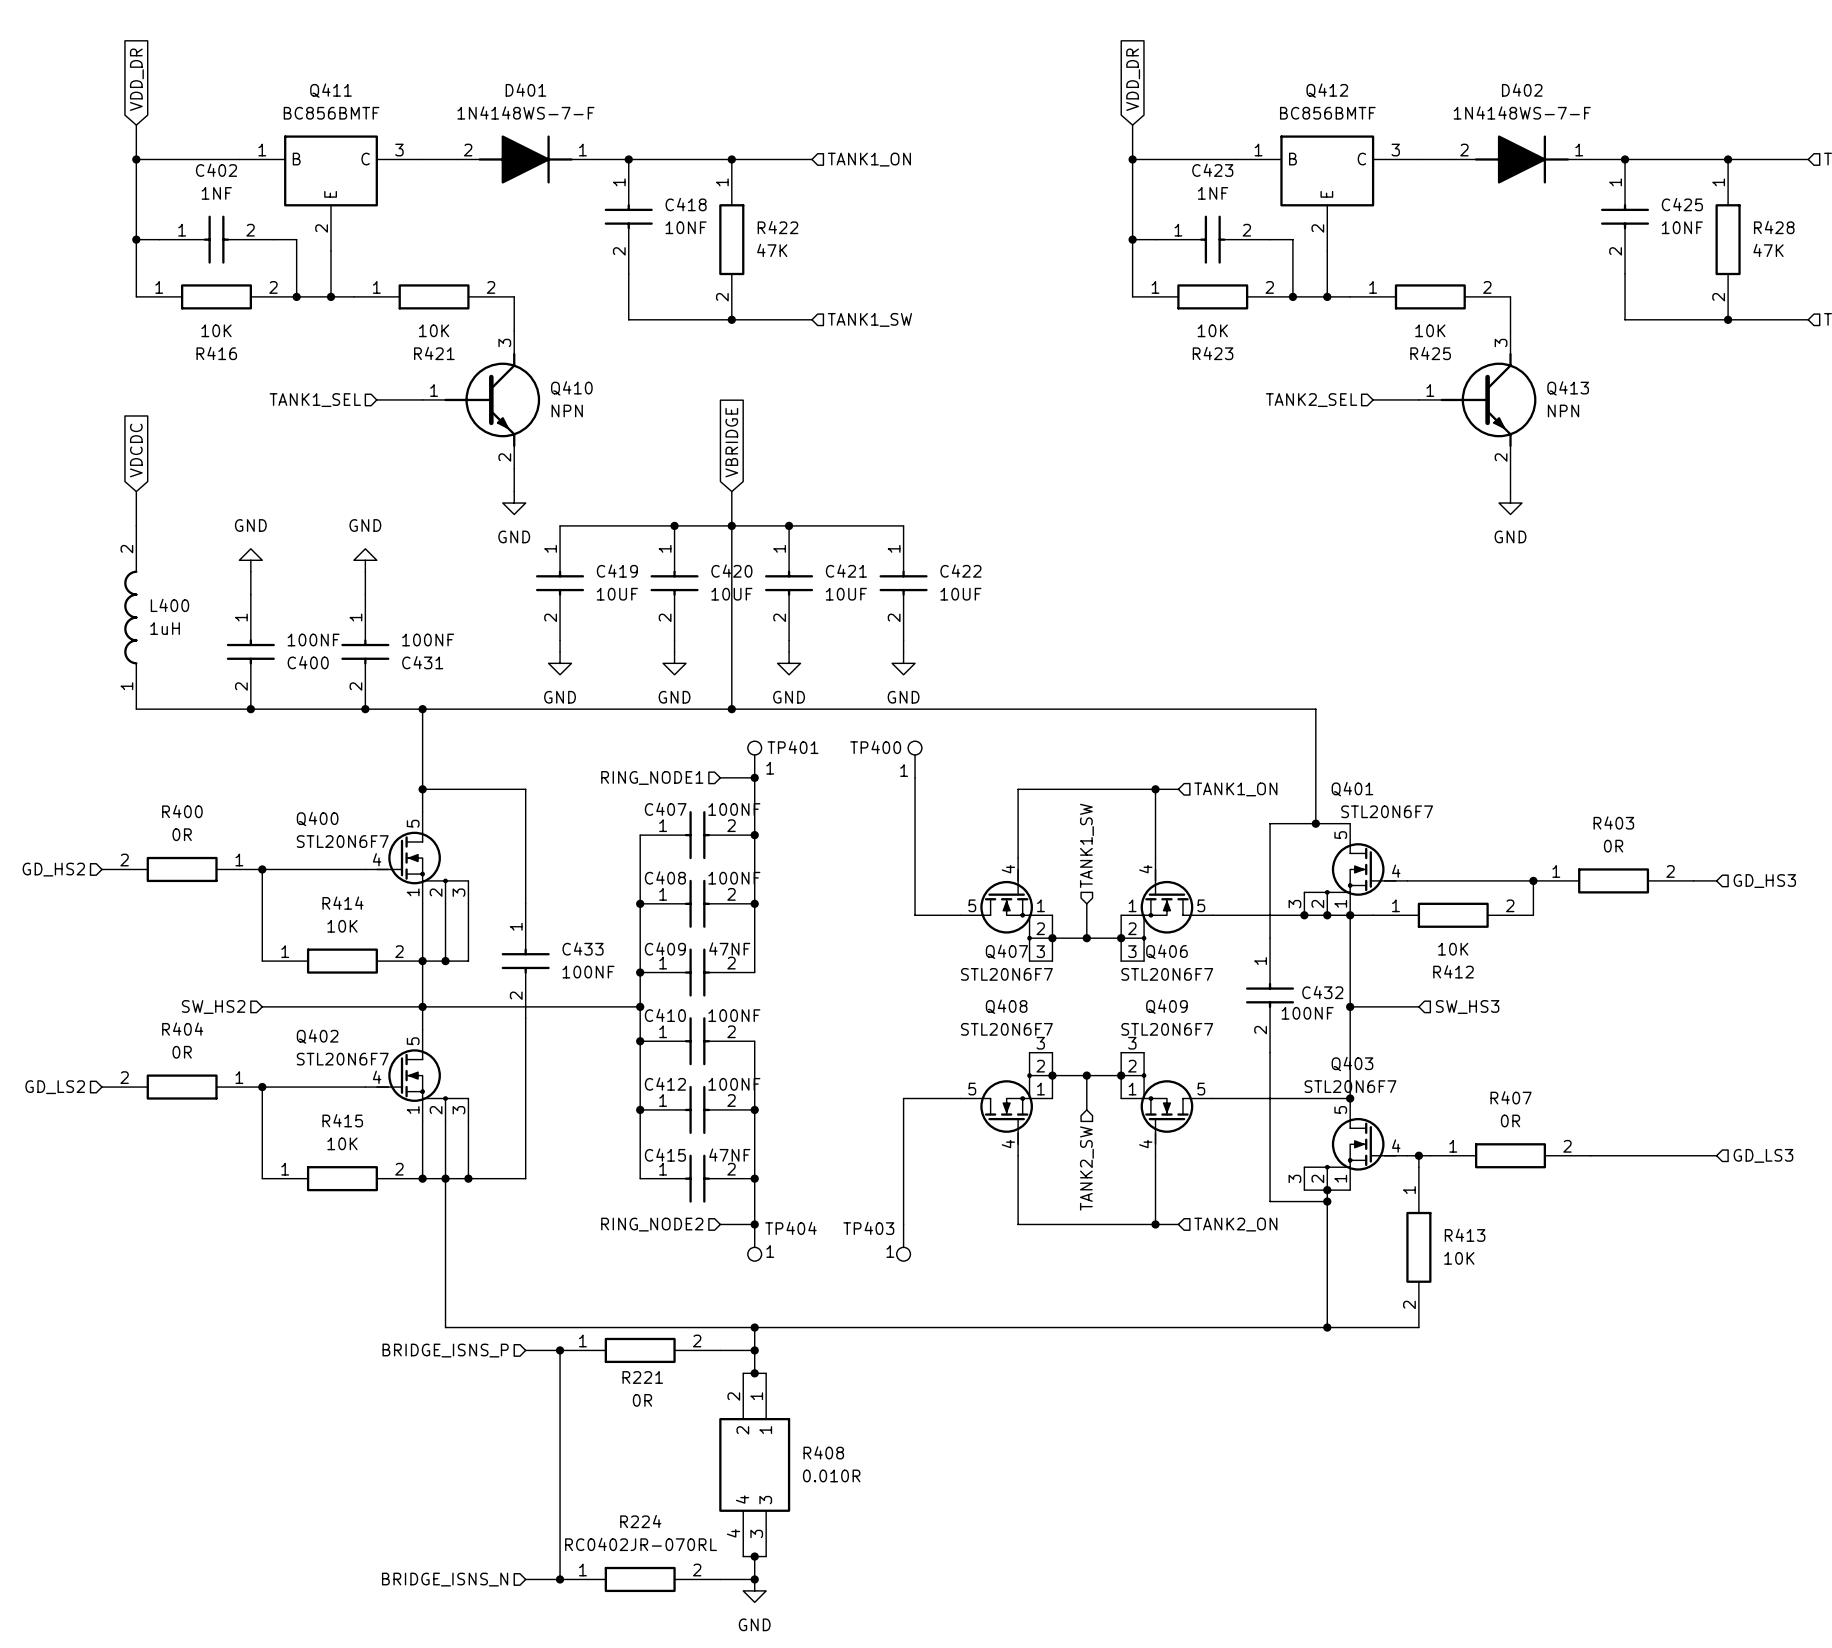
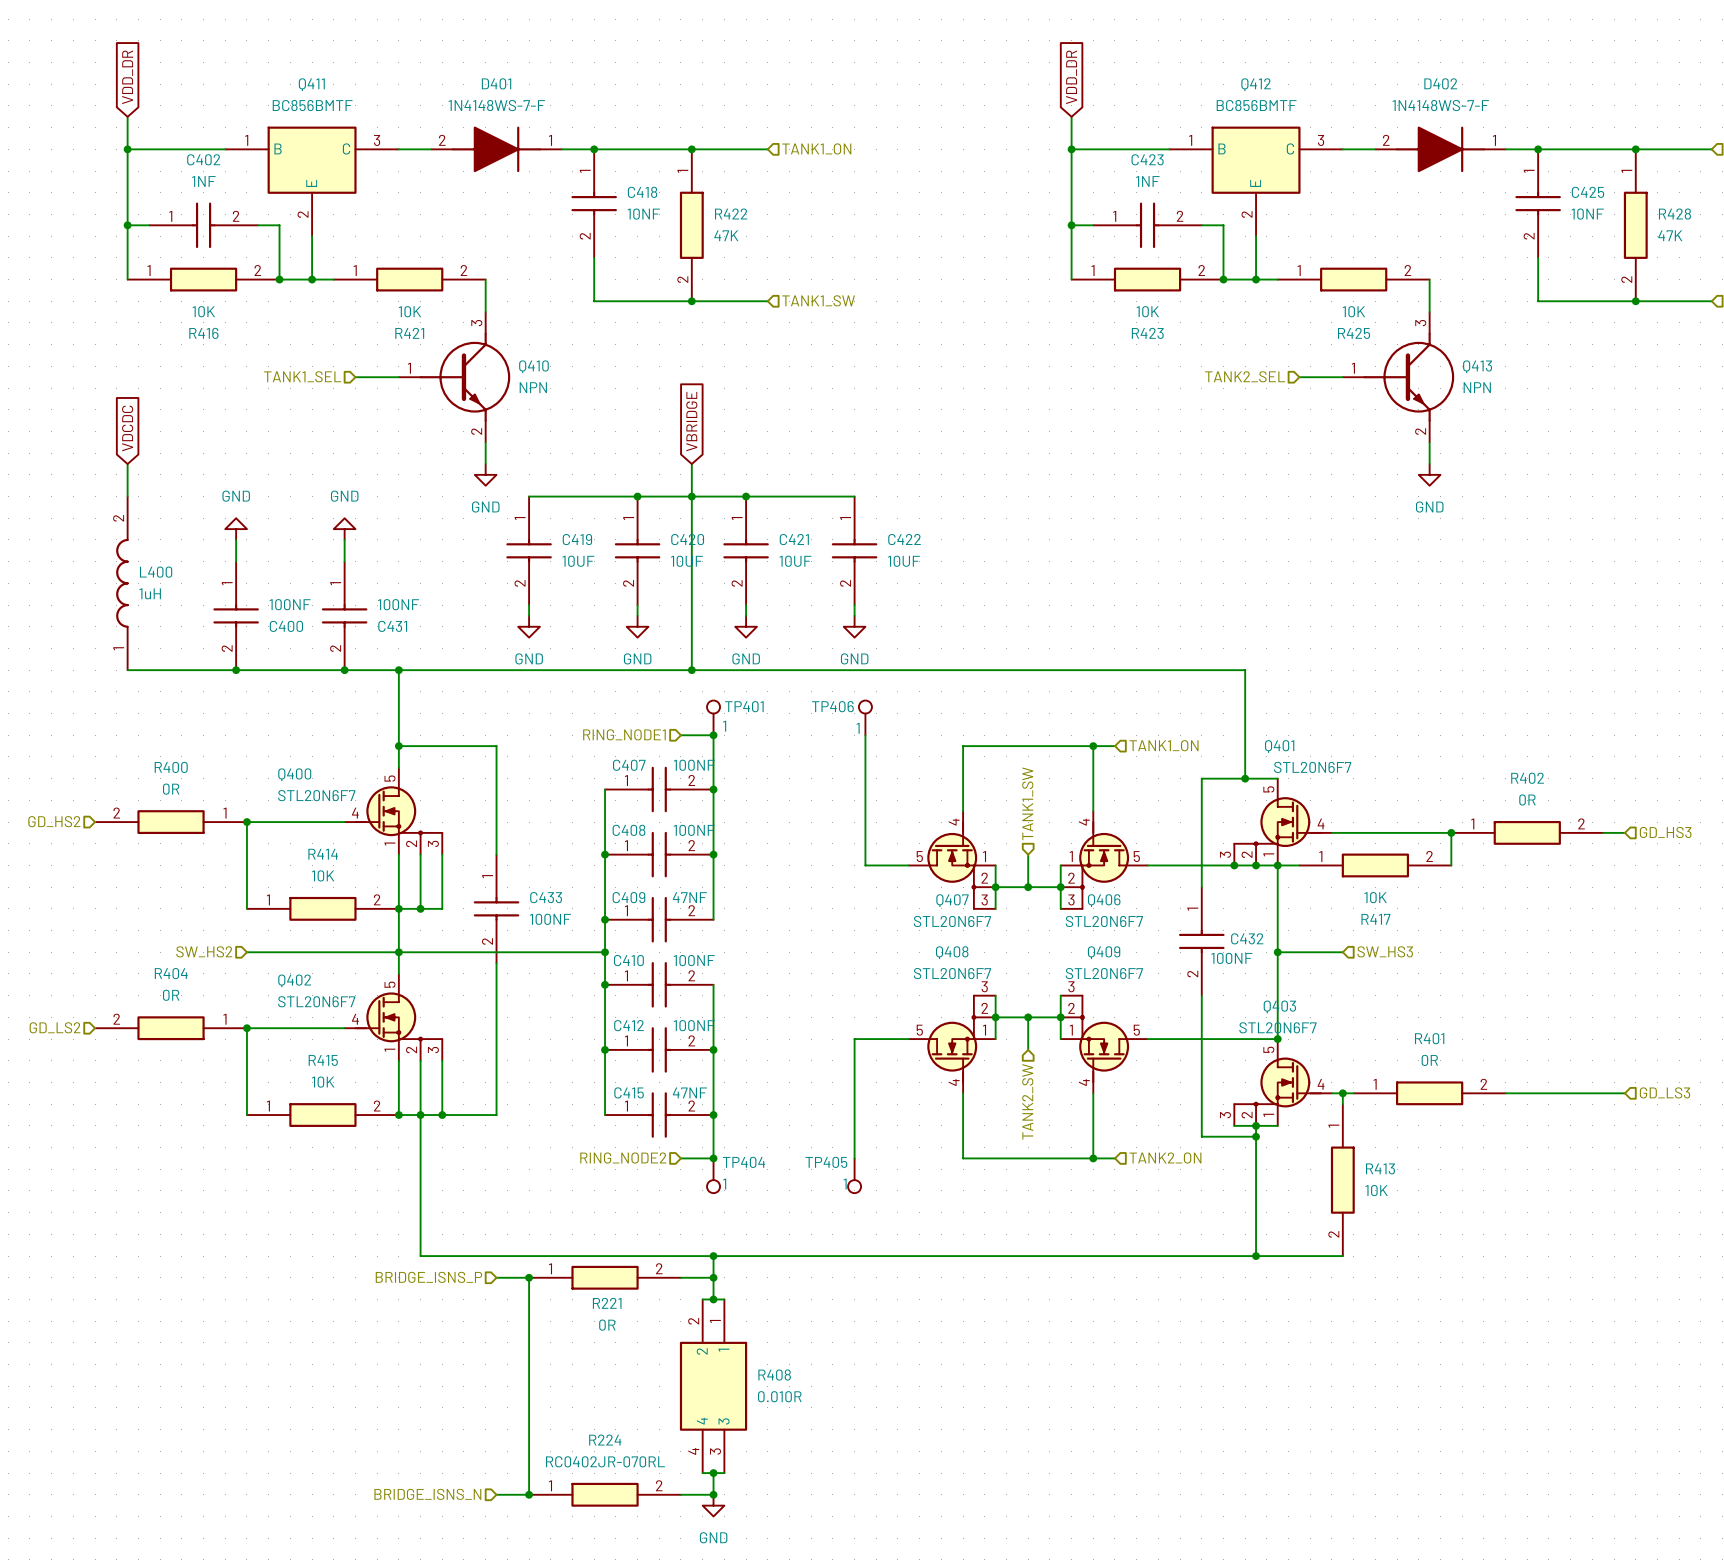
TP400 name: TP400 (875, 747) -> TP406 (832, 706)
R403 name: R403 (1613, 822) -> R402 (1527, 778)
R412 name: R412 (1453, 971) -> R417 (1375, 919)
R407 name: R407 (1511, 1097) -> R401 (1429, 1038)
TP403 name: TP403 (868, 1228) -> TP405 (826, 1162)

